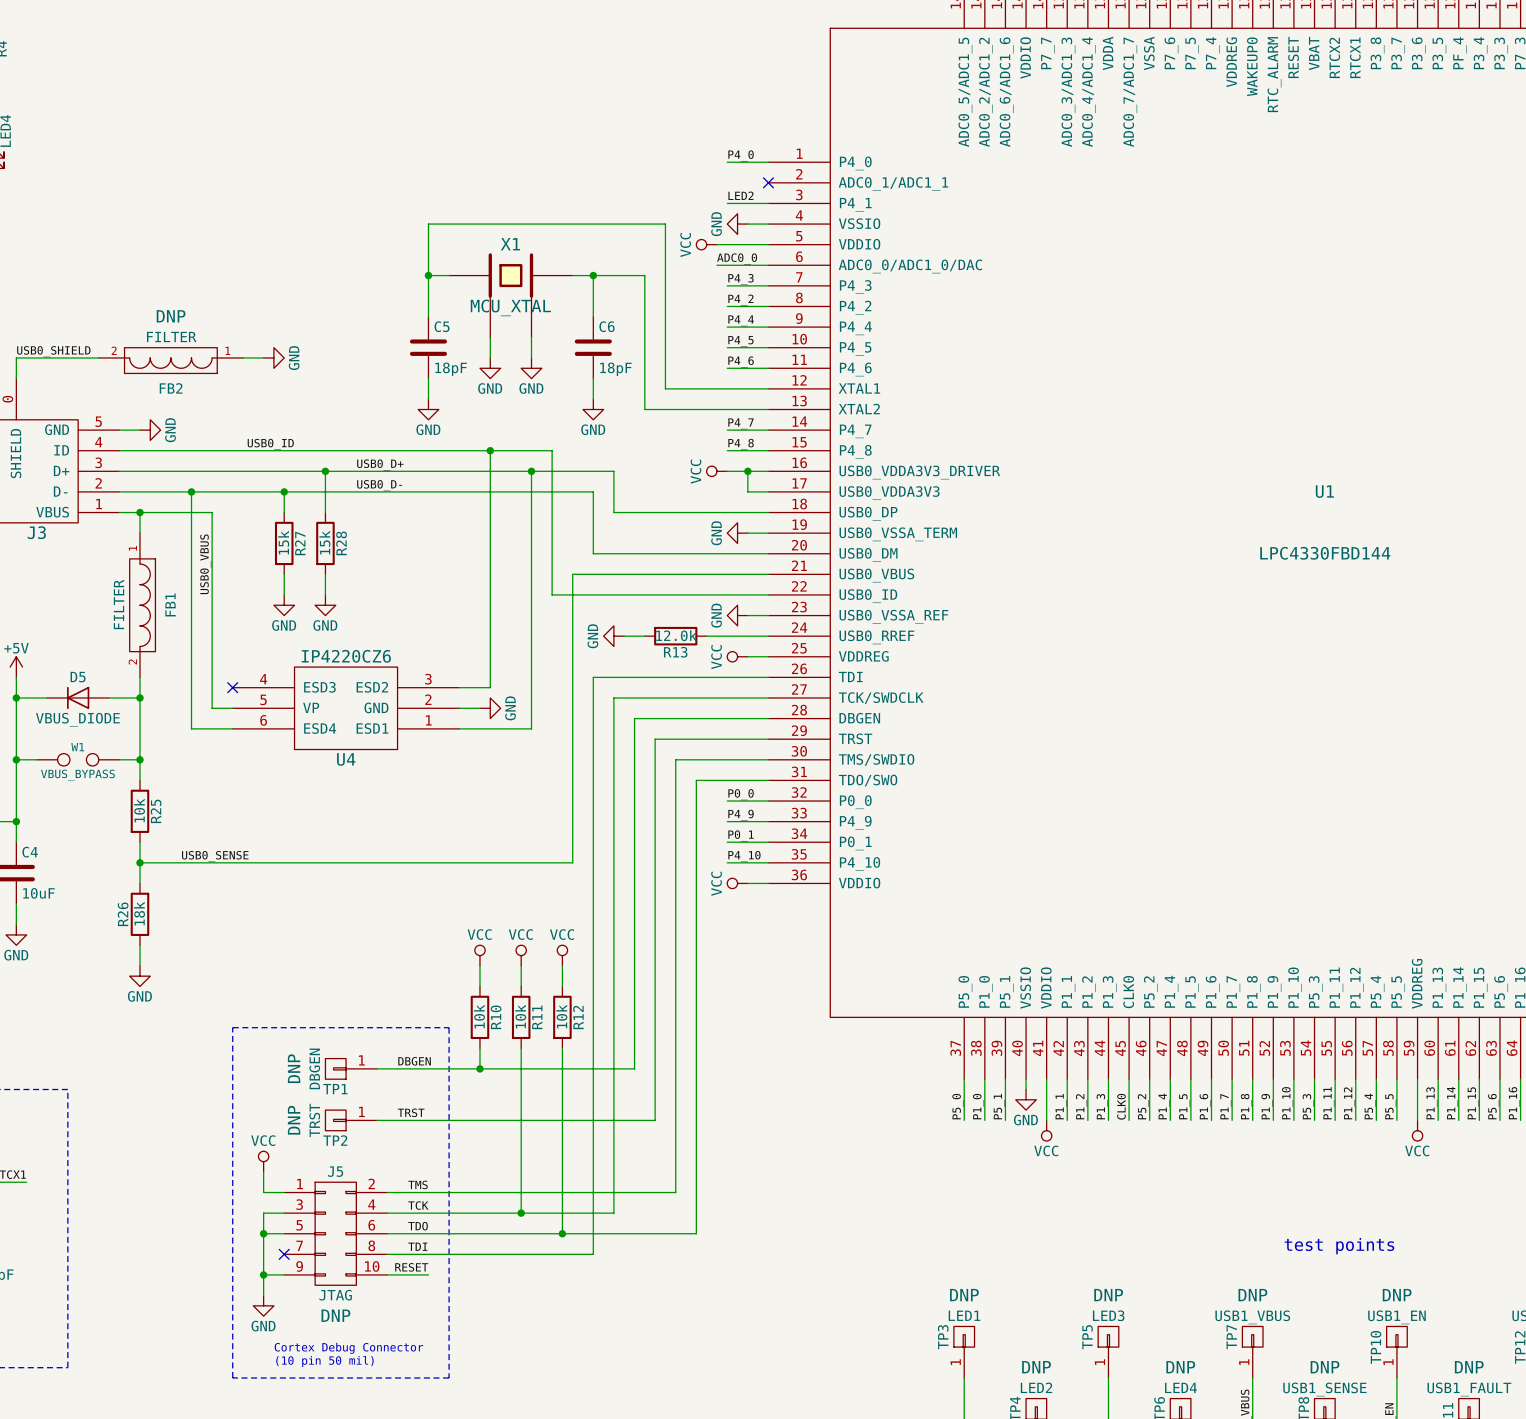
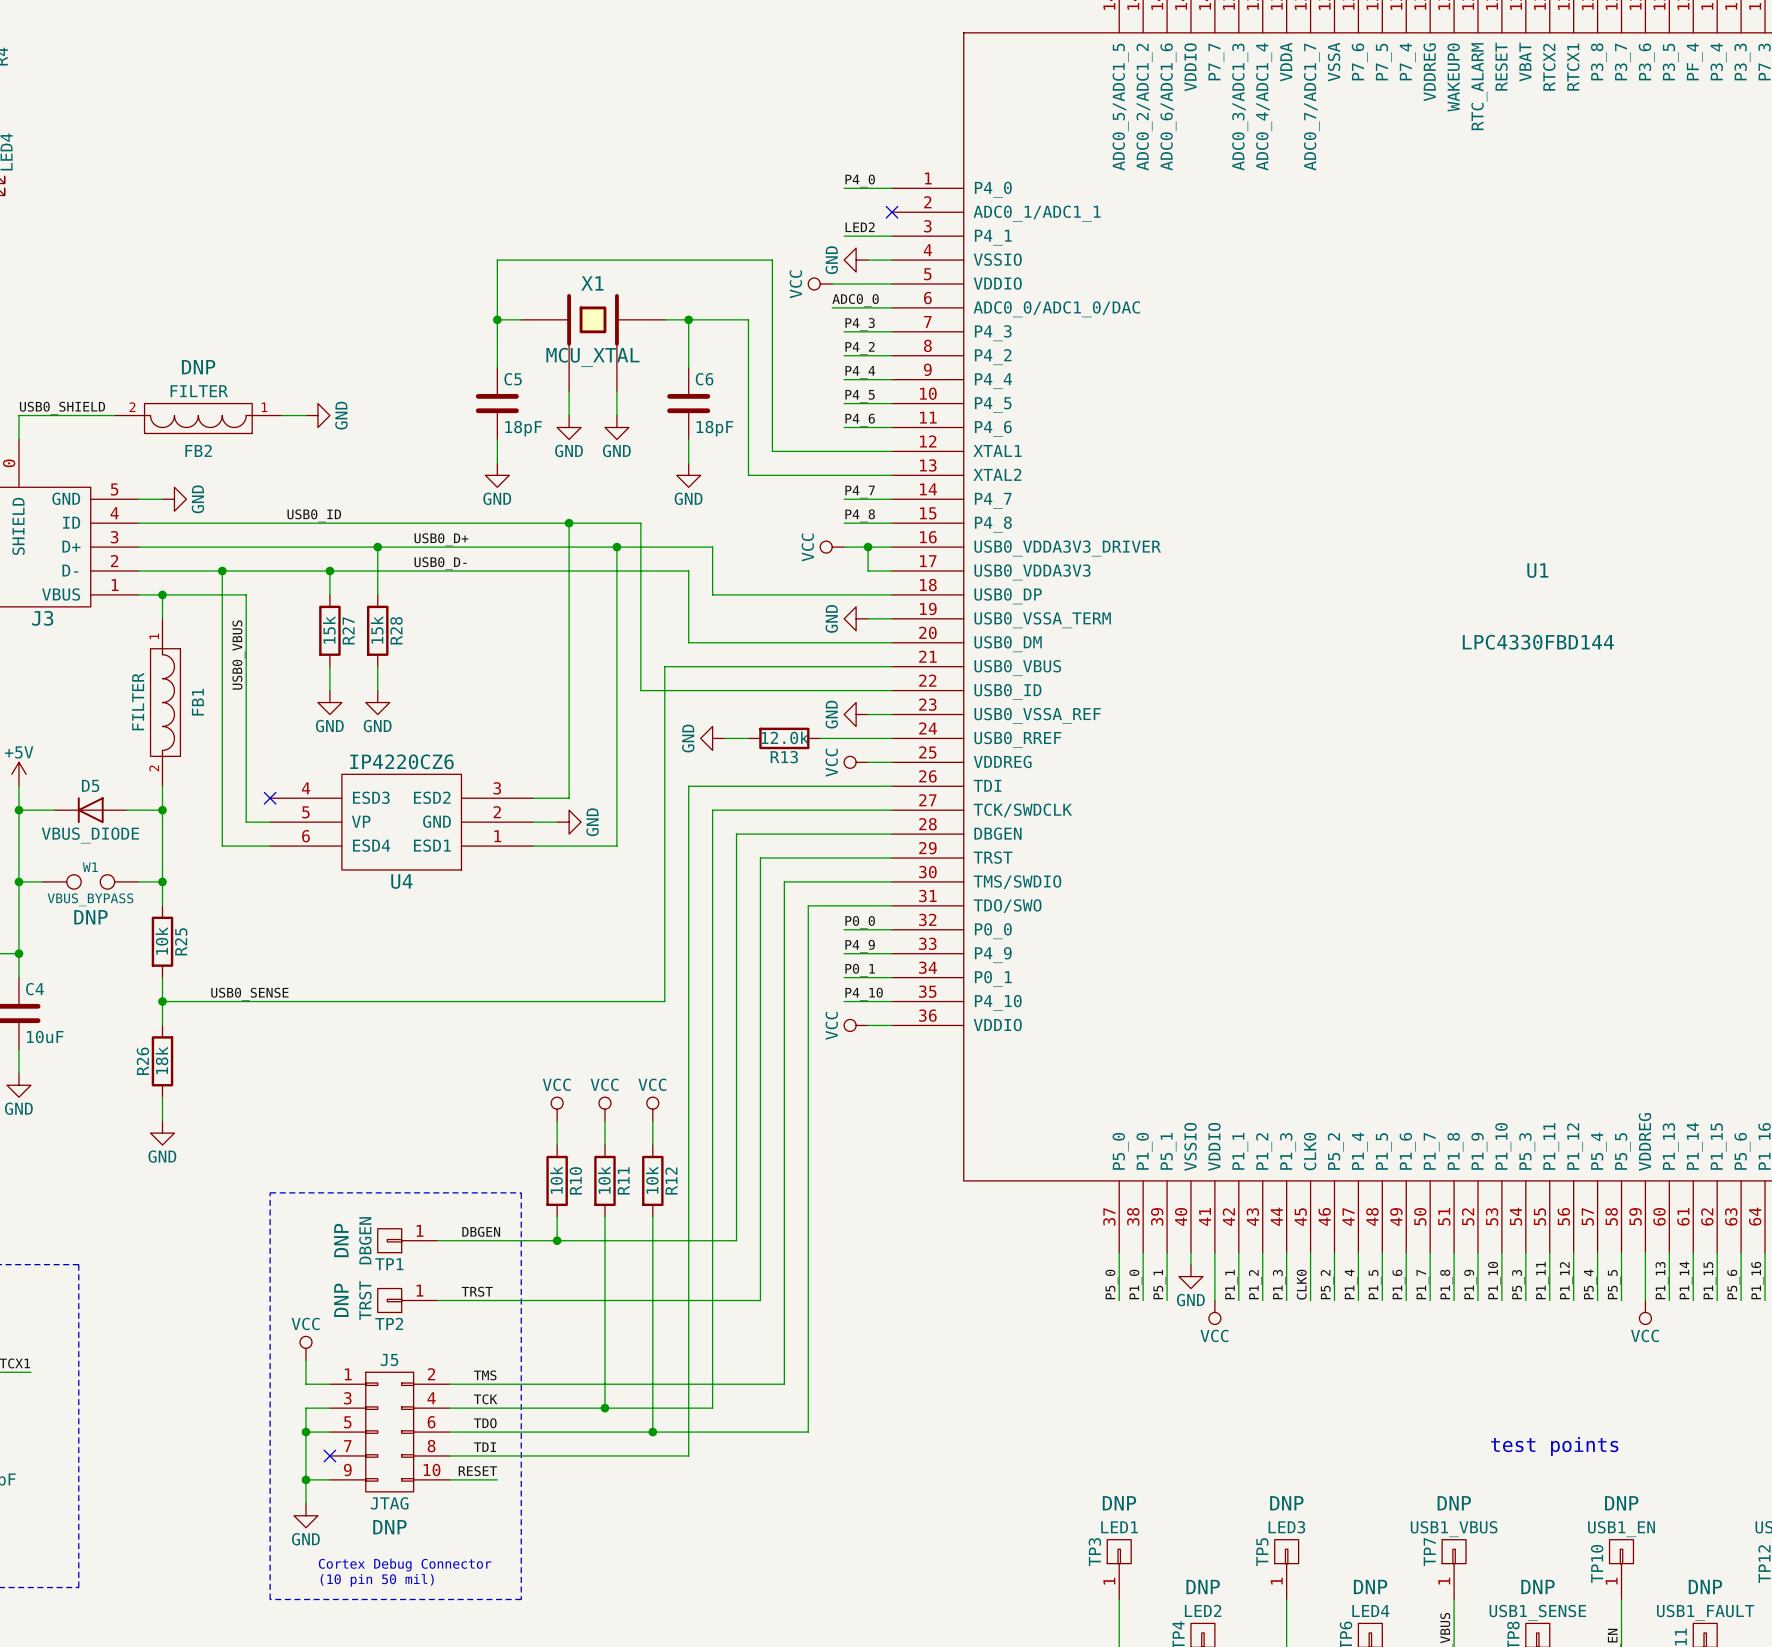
W1 text: none -> DNP (90, 917)

